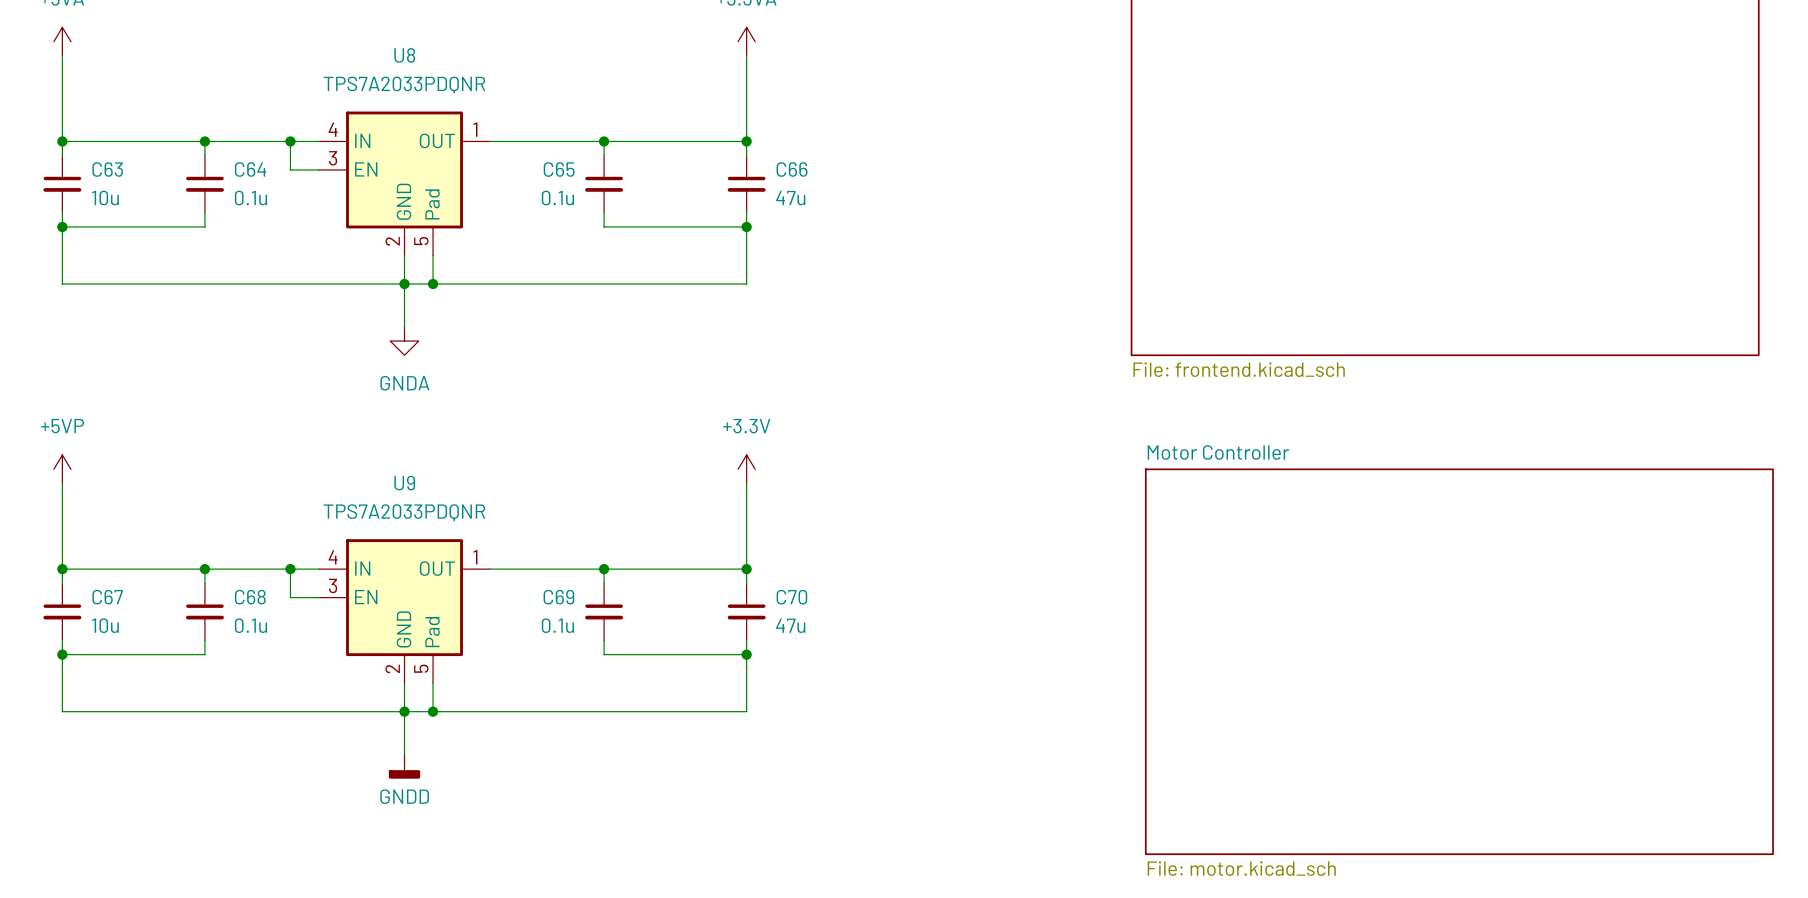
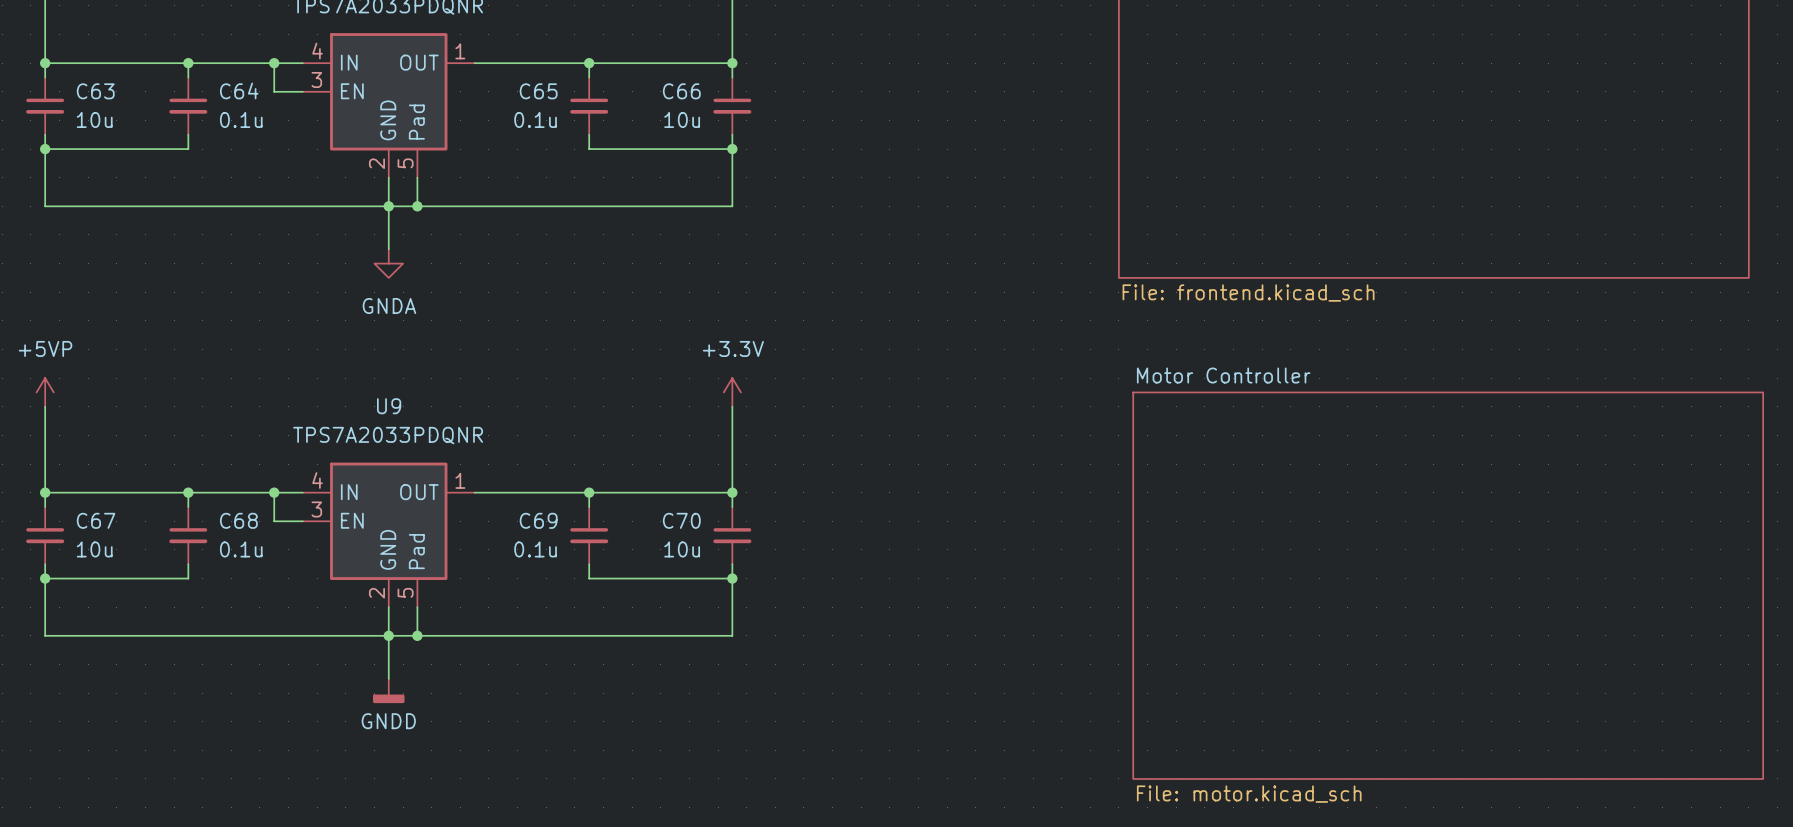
C66 name position: C66 (792, 169) -> C66 (681, 91)
C66 value: 47u (790, 198) -> 10u (682, 119)
C70 name position: C70 (791, 597) -> C70 (681, 520)
C70 value: 47u (790, 625) -> 10u (682, 549)

